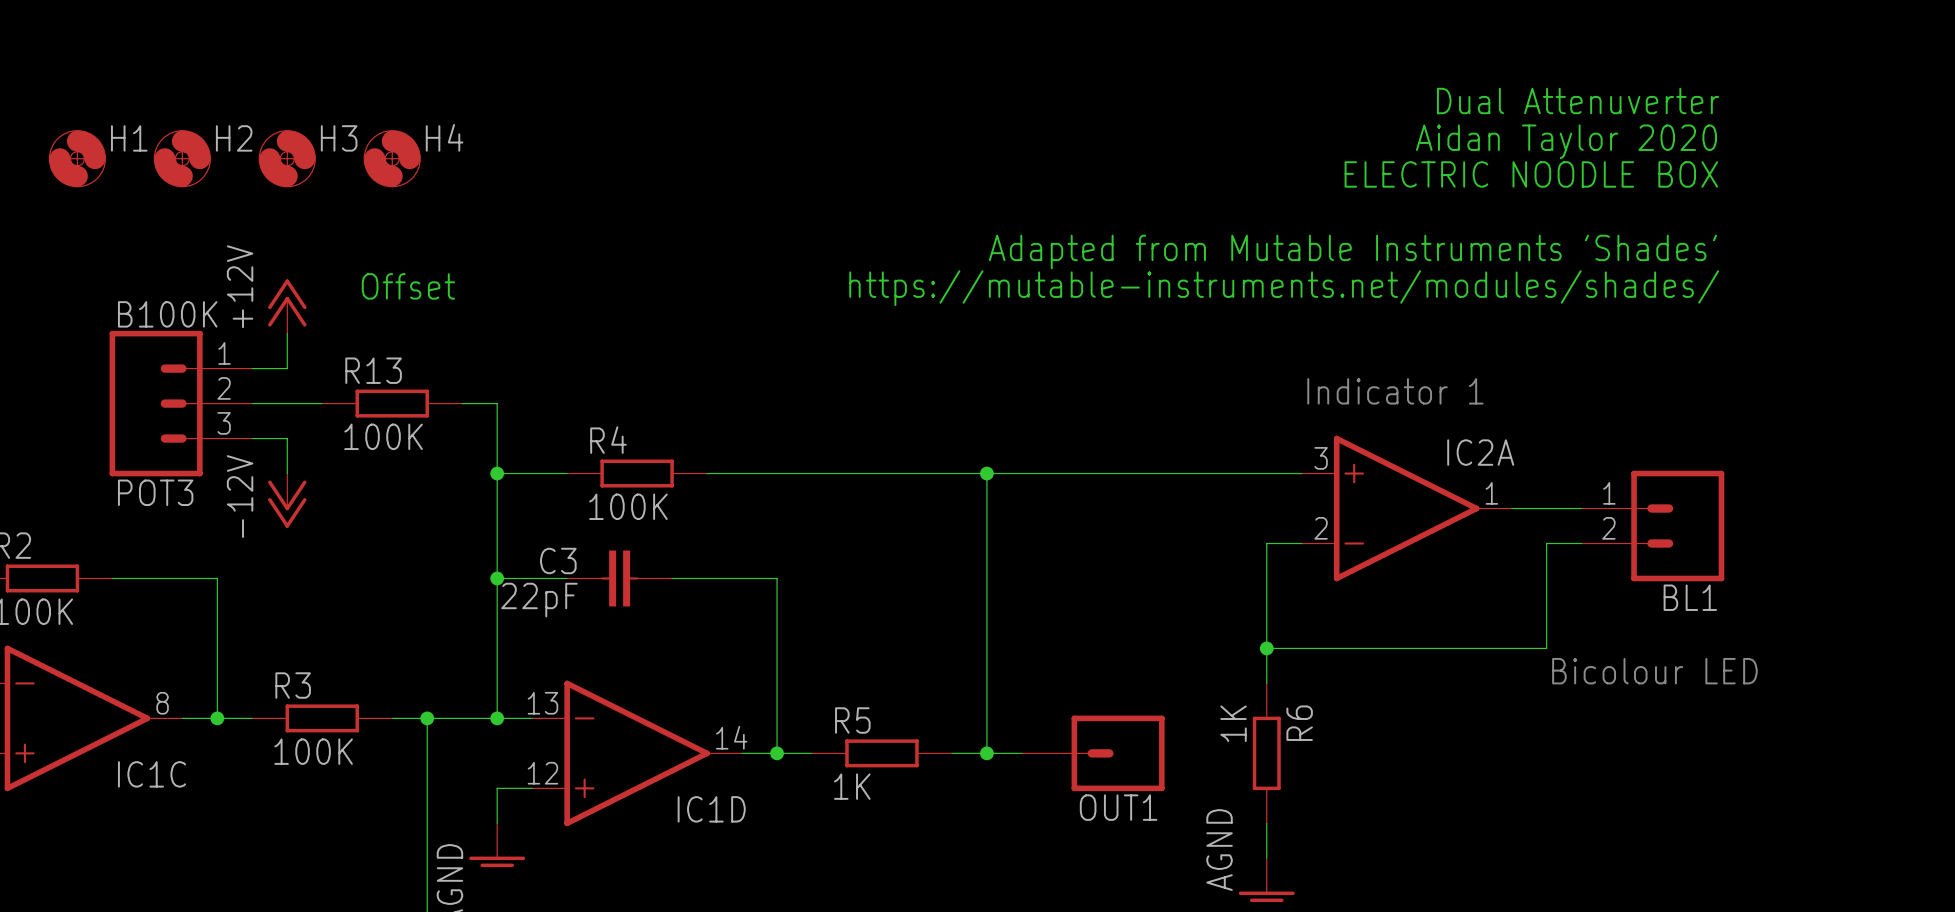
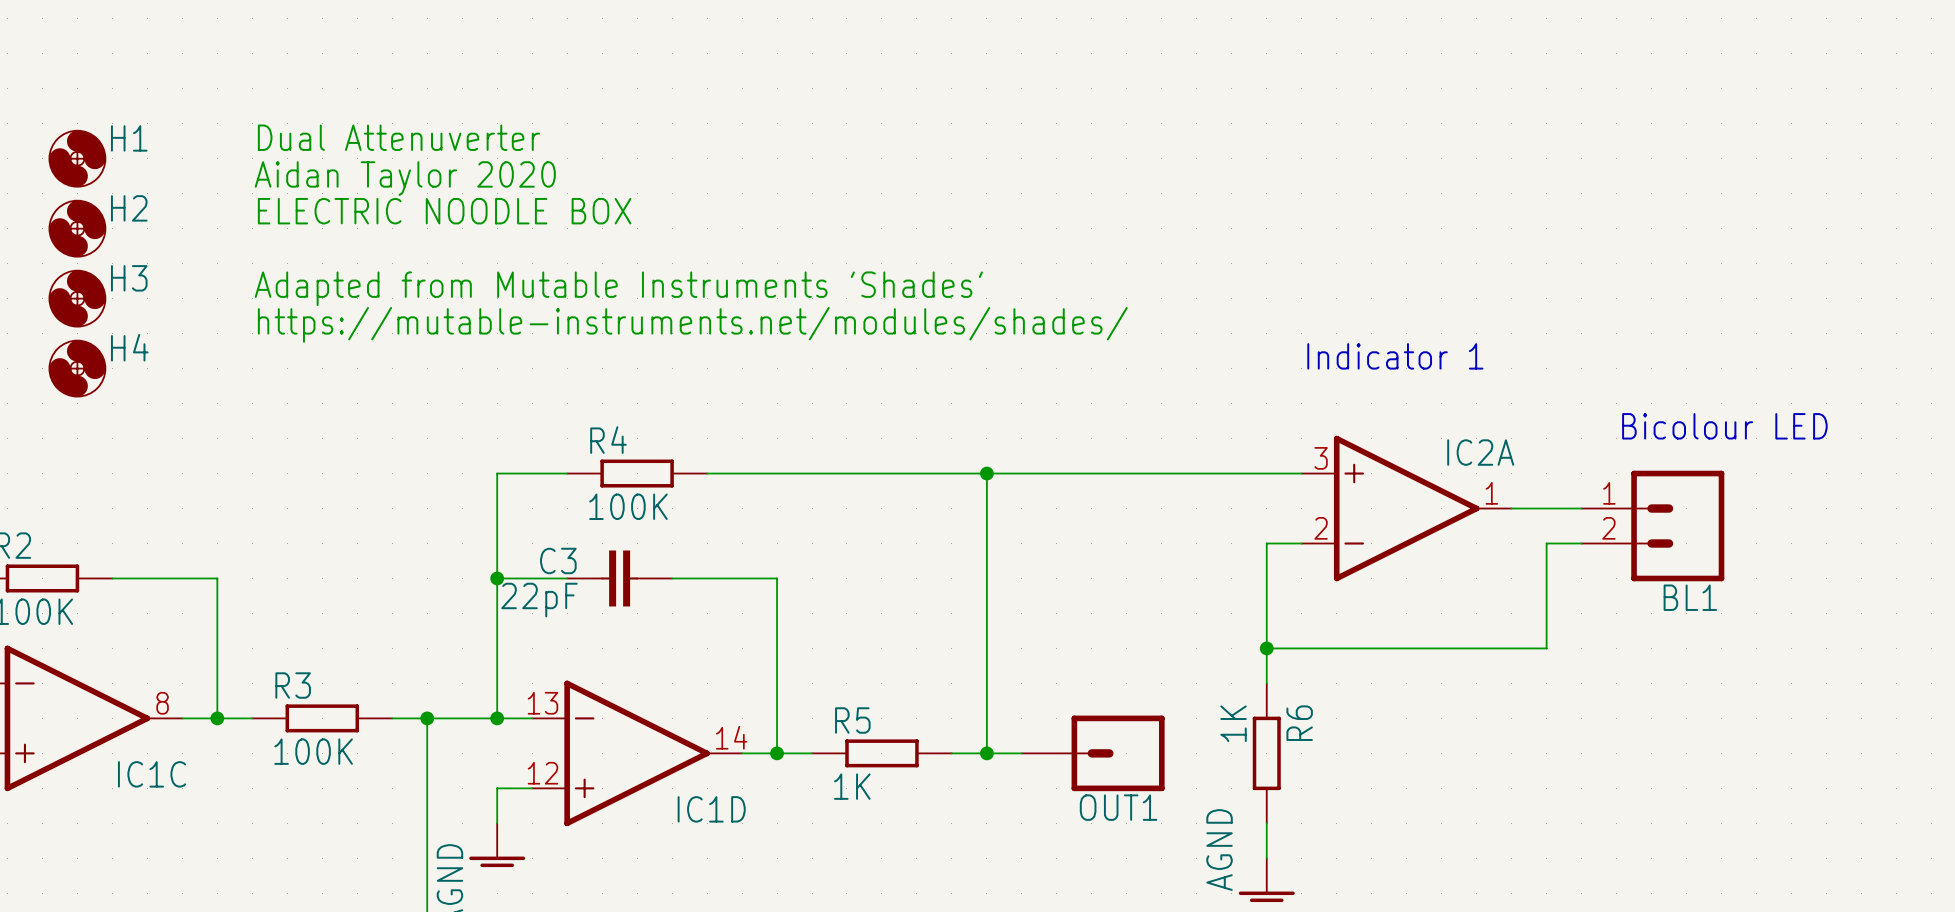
text: Dual Attenuverter (1578, 100) -> none
text: none -> Dual Attenuverter (398, 137)
text: Aidan Taylor 2020 (1566, 141) -> none
H2 position: (182, 158) -> (77, 228)
H3 position: (287, 158) -> (77, 298)
H4 position: (392, 158) -> (77, 368)
text: ELECTRIC NOODLE BOX (1531, 174) -> none
text: none -> Aidan Taylor 2020 (405, 178)
text: none -> ELECTRIC NOODLE BOX (444, 211)
text: Adapted from Mutable Instruments 'Shades' (1352, 251) -> none
text: Offset (408, 286) -> none
text: none -> Adapted from Mutable Instruments 'Shades' (618, 288)
text: https://mutable-instruments.net/modules/shades/ (1284, 288) -> none
power symbol: +12V (287, 306) -> none
text: none -> https://mutable-instruments.net/modules/shades/ (692, 324)
wire: (287, 333) (287, 368) (252, 368) -> none
text position: Indicator 1 (1395, 391) -> Indicator 1 (1395, 356)
POT3: B100K (180, 403) -> none
wire: (252, 403) (322, 403) -> none
R13: 100K (392, 403) -> none
wire: (462, 403) (497, 403) (497, 473) -> none
wire: (252, 438) (287, 438) (287, 473) -> none
junction: (497, 473) -> none
power symbol: -12V (287, 500) -> none
text position: Bicolour LED (1654, 671) -> Bicolour LED (1724, 426)

